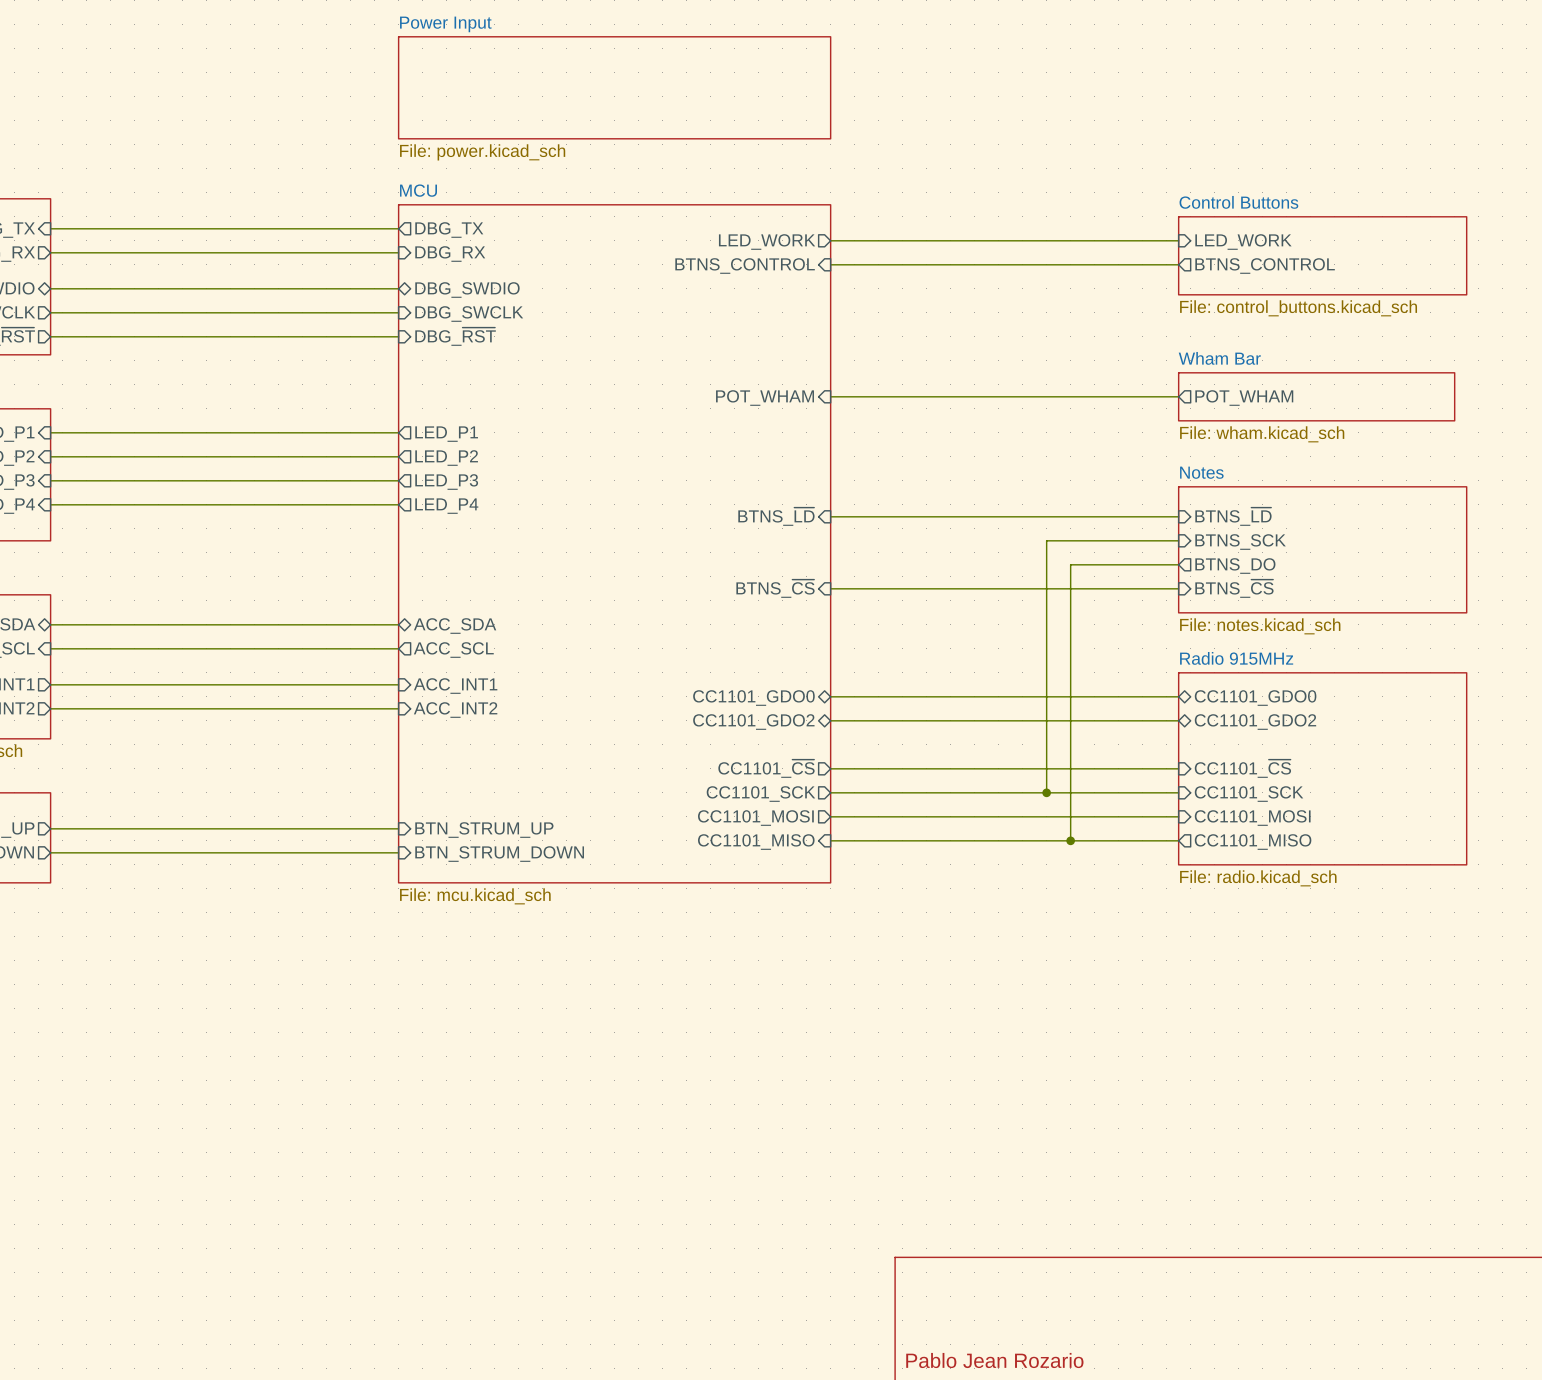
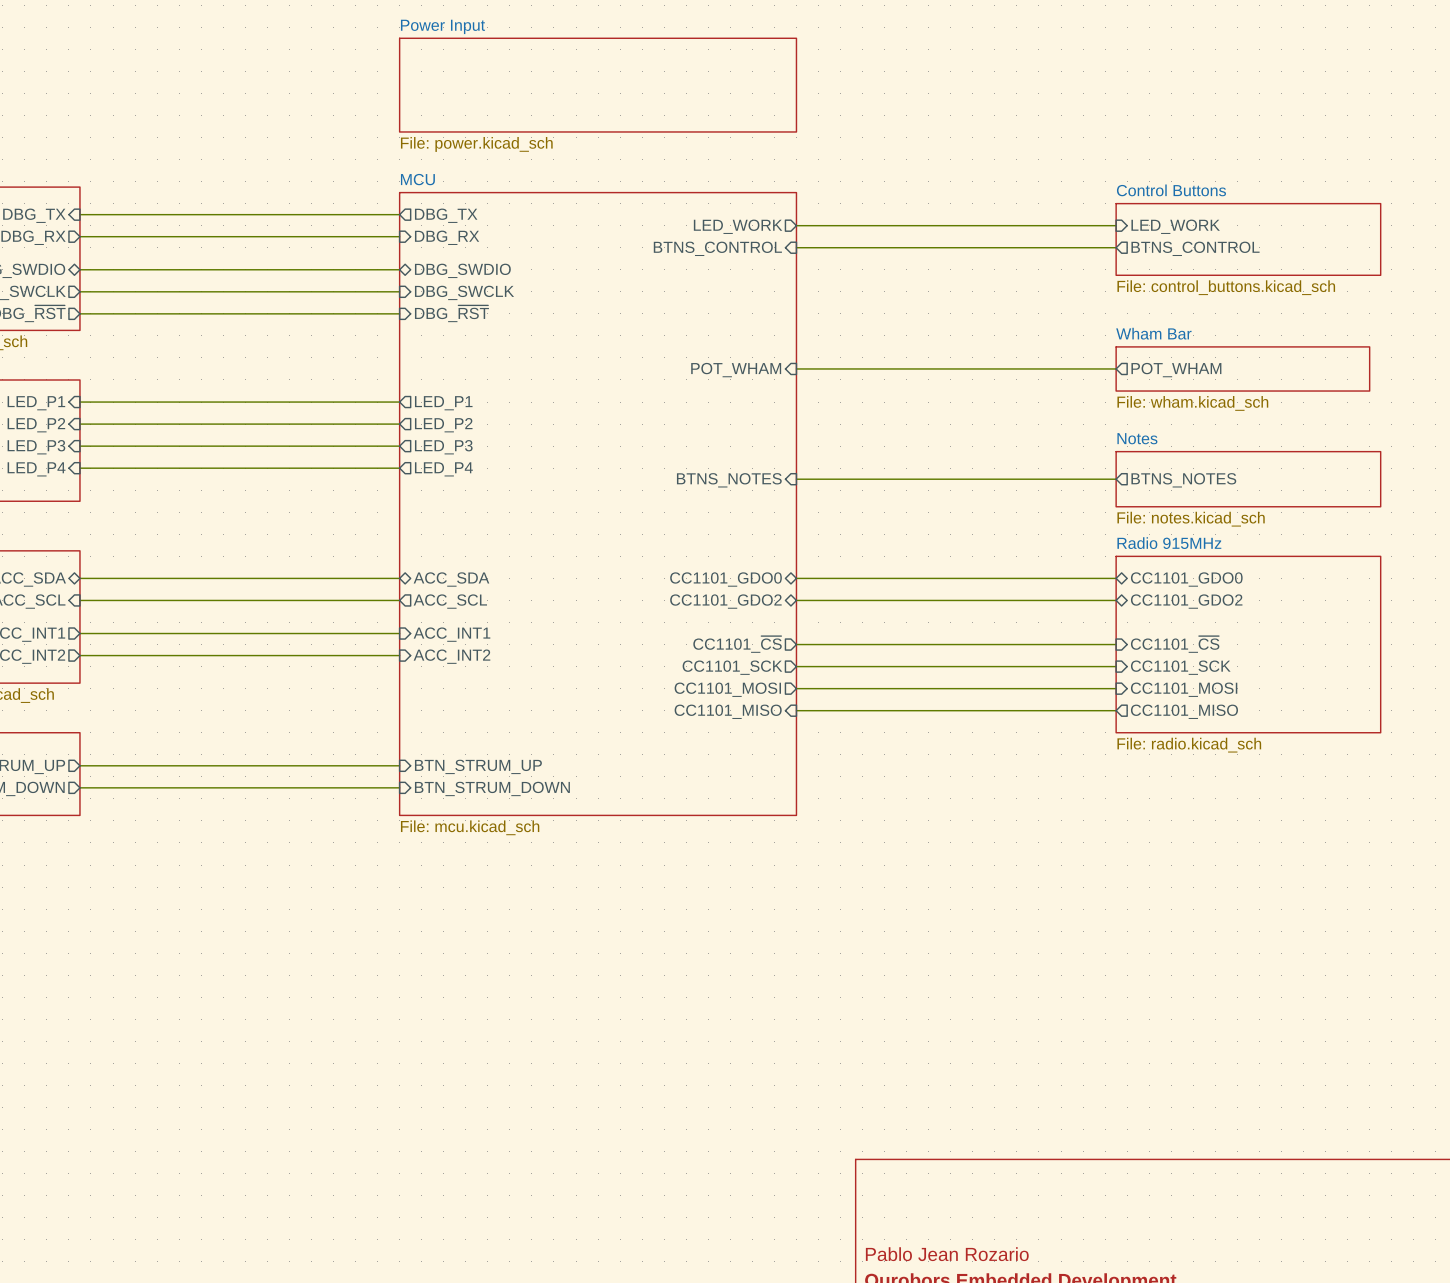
sheet pin: BTNS_~{LD} (776, 516) -> BTNS_NOTES (729, 480)
sheet pin shape: input (1233, 516) -> output (1183, 480)
sheet pin: BTNS_~{LD} (1233, 516) -> BTNS_NOTES (1183, 480)
sheet Notes: none -> File: notes.kicad_sch (1248, 479)
wire: (1178, 540) (1046, 540) (1046, 792) -> none
sheet pin: BTNS_SCK (1240, 542) -> none
sheet Notes: File: notes.kicad_sch (1322, 549) -> none
wire: (1178, 564) (1070, 564) (1070, 840) -> none
sheet pin: BTNS_DO (1235, 566) -> none
sheet pin: BTNS_~{CS} (775, 588) -> none
wire: (830, 588) (1178, 588) -> none
sheet pin: BTNS_~{CS} (1234, 588) -> none
sheet pin: none -> CC1101_GDO0 (726, 579)
sheet pin: none -> CC1101_GDO0 (1186, 579)
sheet pin: none -> CC1101_GDO2 (725, 601)
sheet pin: none -> CC1101_GDO2 (1186, 601)
sheet pin shape: bidirectional (753, 698) -> output (737, 644)
sheet pin: CC1101_GDO0 (753, 698) -> CC1101_~{CS} (737, 644)
sheet pin shape: bidirectional (1255, 698) -> input (1175, 644)
sheet pin: CC1101_GDO0 (1255, 698) -> CC1101_~{CS} (1175, 644)
sheet pin shape: bidirectional (753, 722) -> output (732, 667)
sheet pin: CC1101_GDO2 (753, 722) -> CC1101_SCK (732, 667)
sheet pin shape: bidirectional (1255, 722) -> input (1180, 667)
sheet pin: CC1101_GDO2 (1255, 722) -> CC1101_SCK (1180, 667)
sheet pin shape: output (766, 768) -> input (728, 711)
sheet pin: CC1101_~{CS} (766, 768) -> CC1101_MISO (728, 711)
sheet pin shape: input (1242, 768) -> output (1184, 711)
sheet pin: CC1101_~{CS} (1242, 768) -> CC1101_MISO (1184, 711)
sheet Radio 915MHz position: (1322, 768) -> (1248, 644)
wire: (830, 792) (1178, 792) -> (796, 578) (1116, 578)
junction: (1046, 792) -> none
sheet pin: CC1101_SCK (760, 794) -> none
sheet pin: CC1101_SCK (1249, 794) -> none
wire: (830, 816) (1178, 816) -> (796, 600) (1116, 600)
sheet pin position: CC1101_MOSI (755, 818) -> CC1101_MOSI (727, 689)
sheet pin position: CC1101_MOSI (1252, 818) -> CC1101_MOSI (1184, 689)
wire: (830, 840) (1178, 840) -> (796, 688) (1116, 688)
junction: (1070, 840) -> none
sheet pin: CC1101_MISO (756, 842) -> none
sheet pin: CC1101_MISO (1253, 842) -> none

